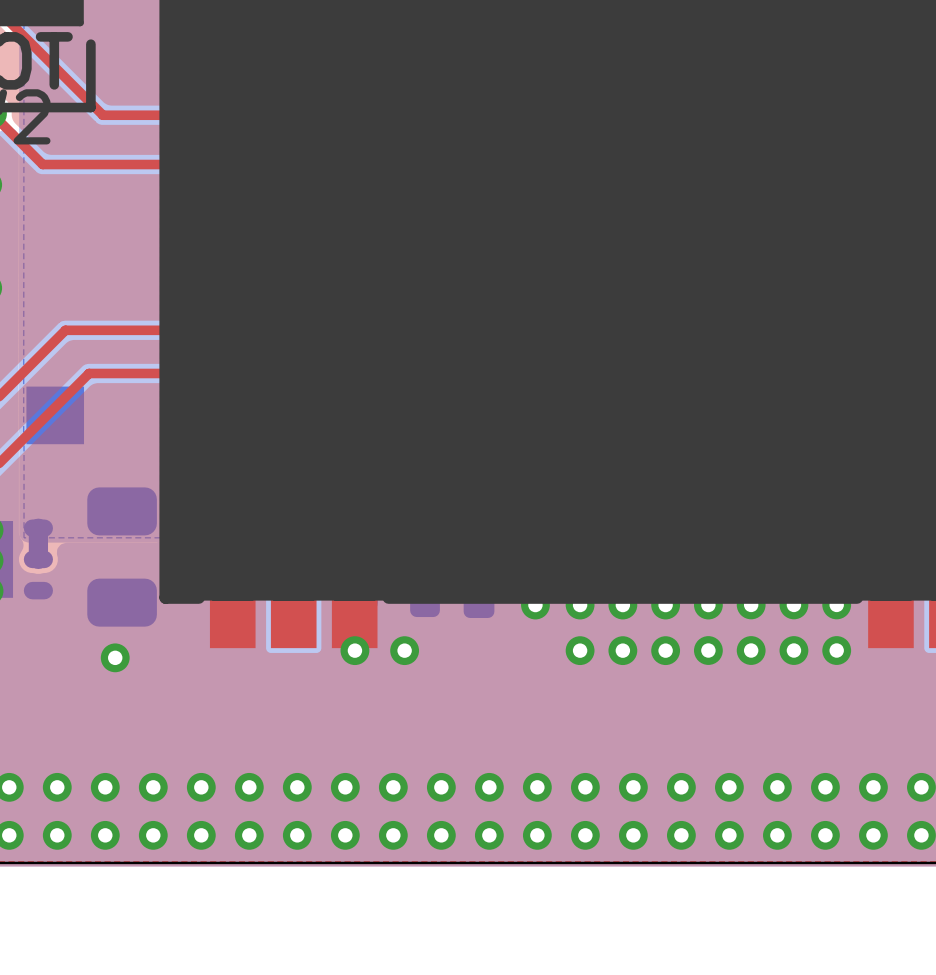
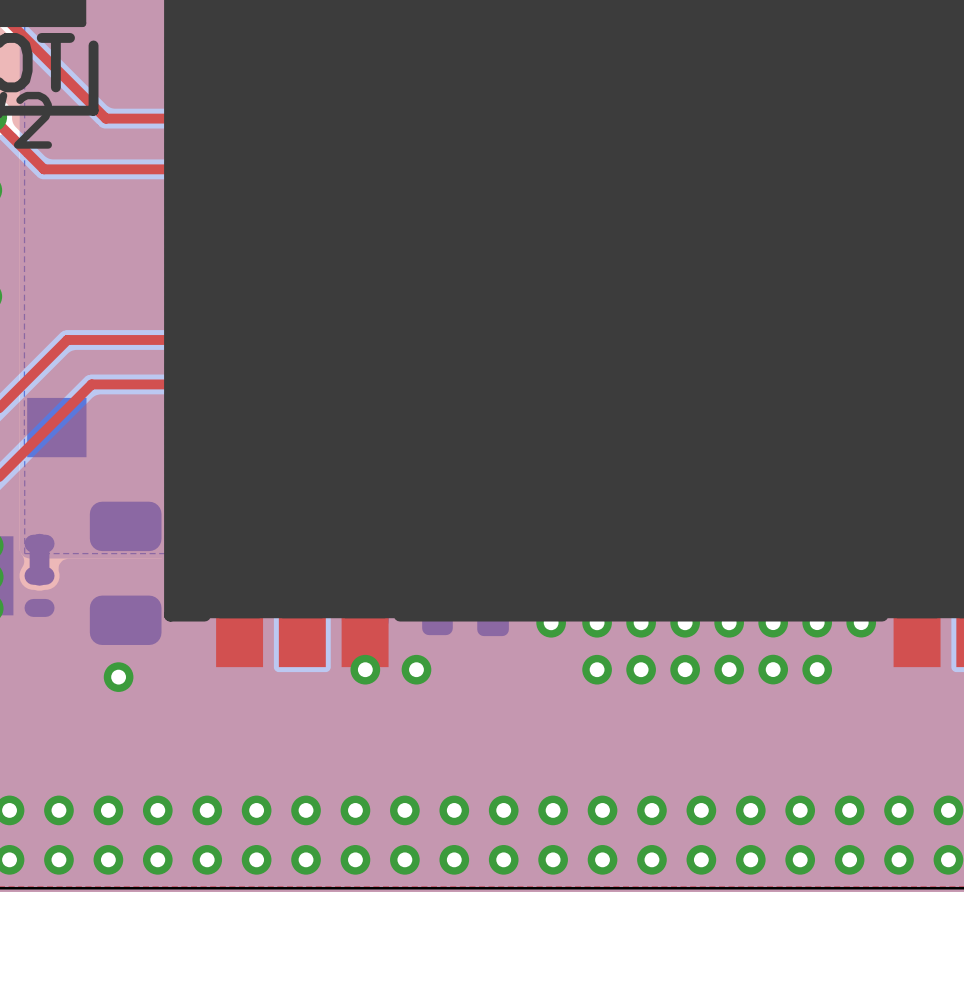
via: (836, 650) -> none

